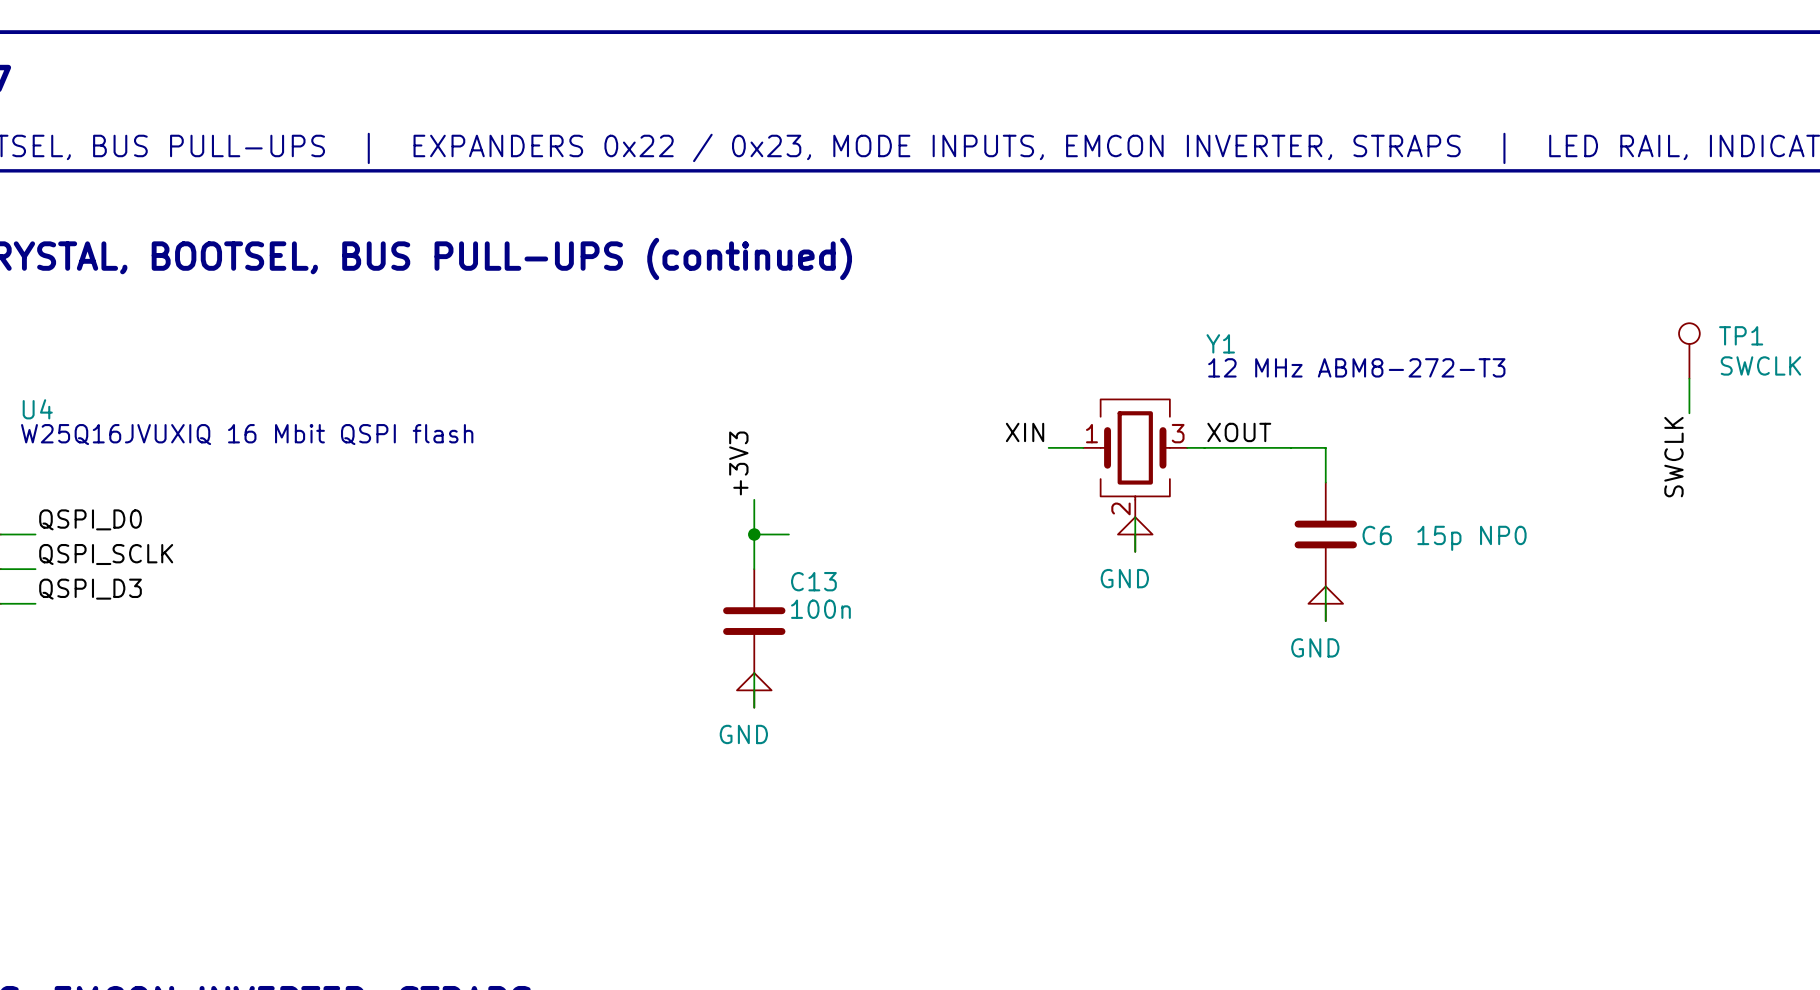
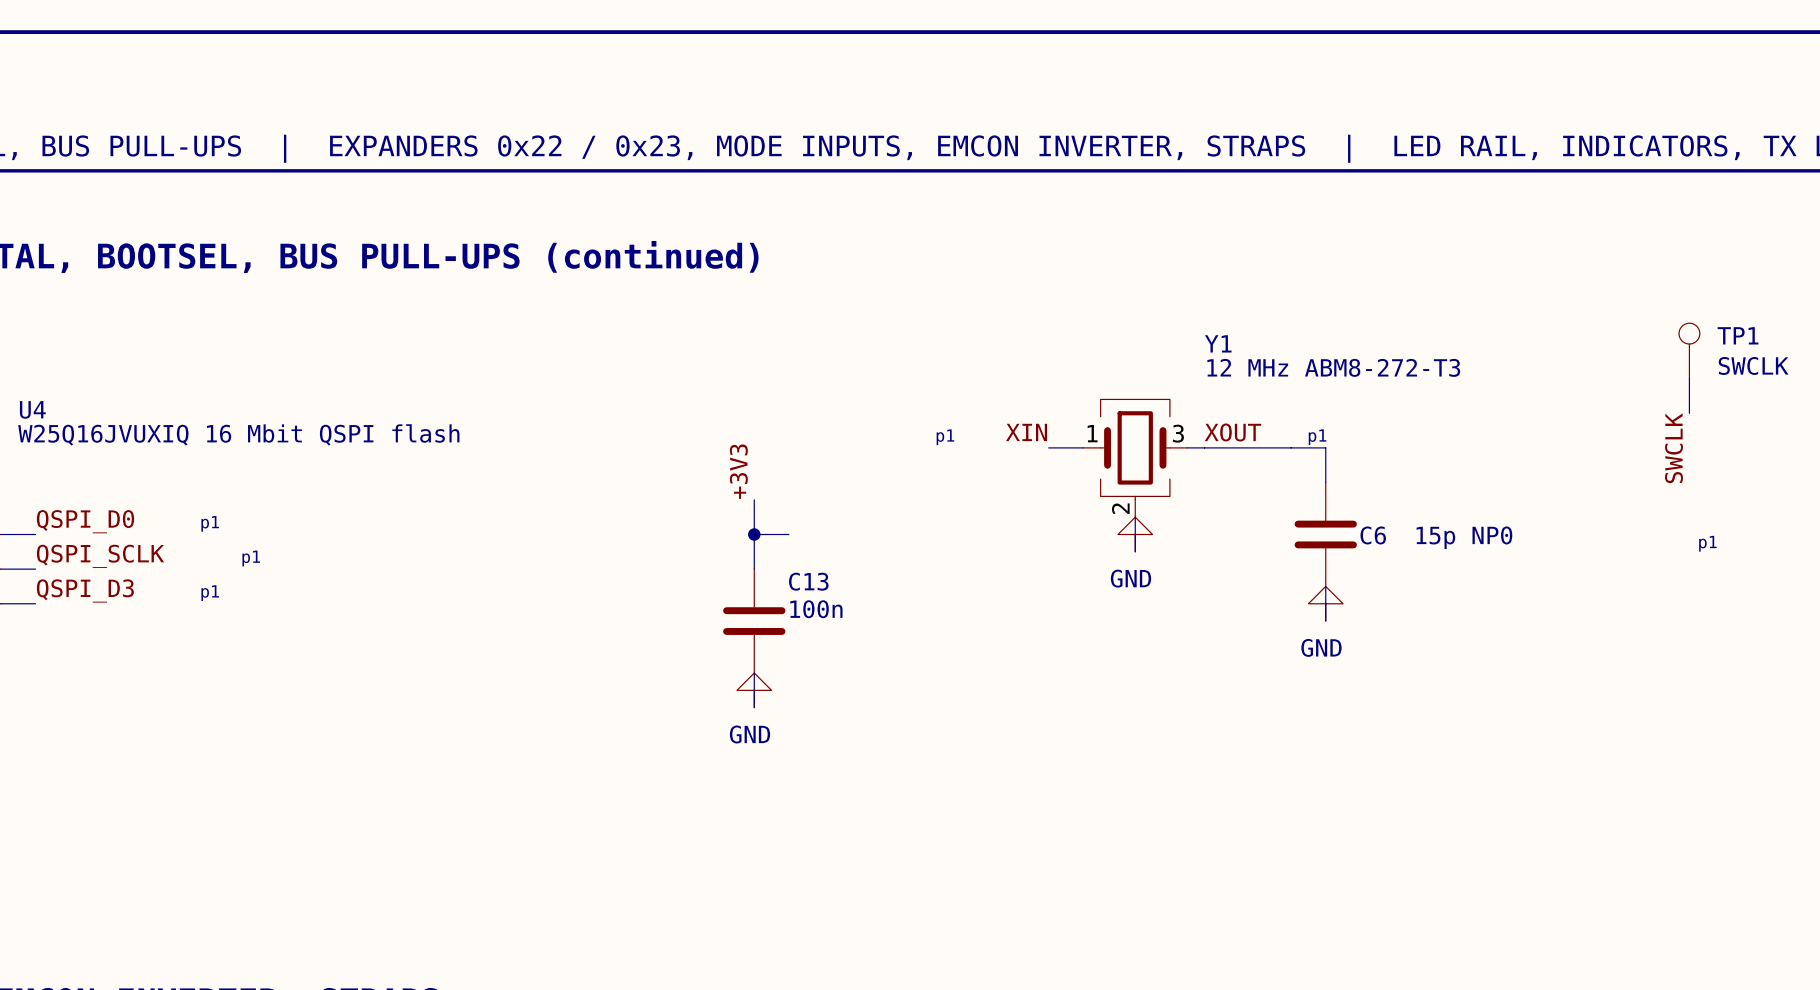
text: none -> p1 (945, 437)
text: none -> p1 (1317, 437)
text: none -> p1 (210, 523)
text: none -> p1 (1707, 543)
text: none -> p1 (251, 558)
text: none -> p1 (210, 593)

